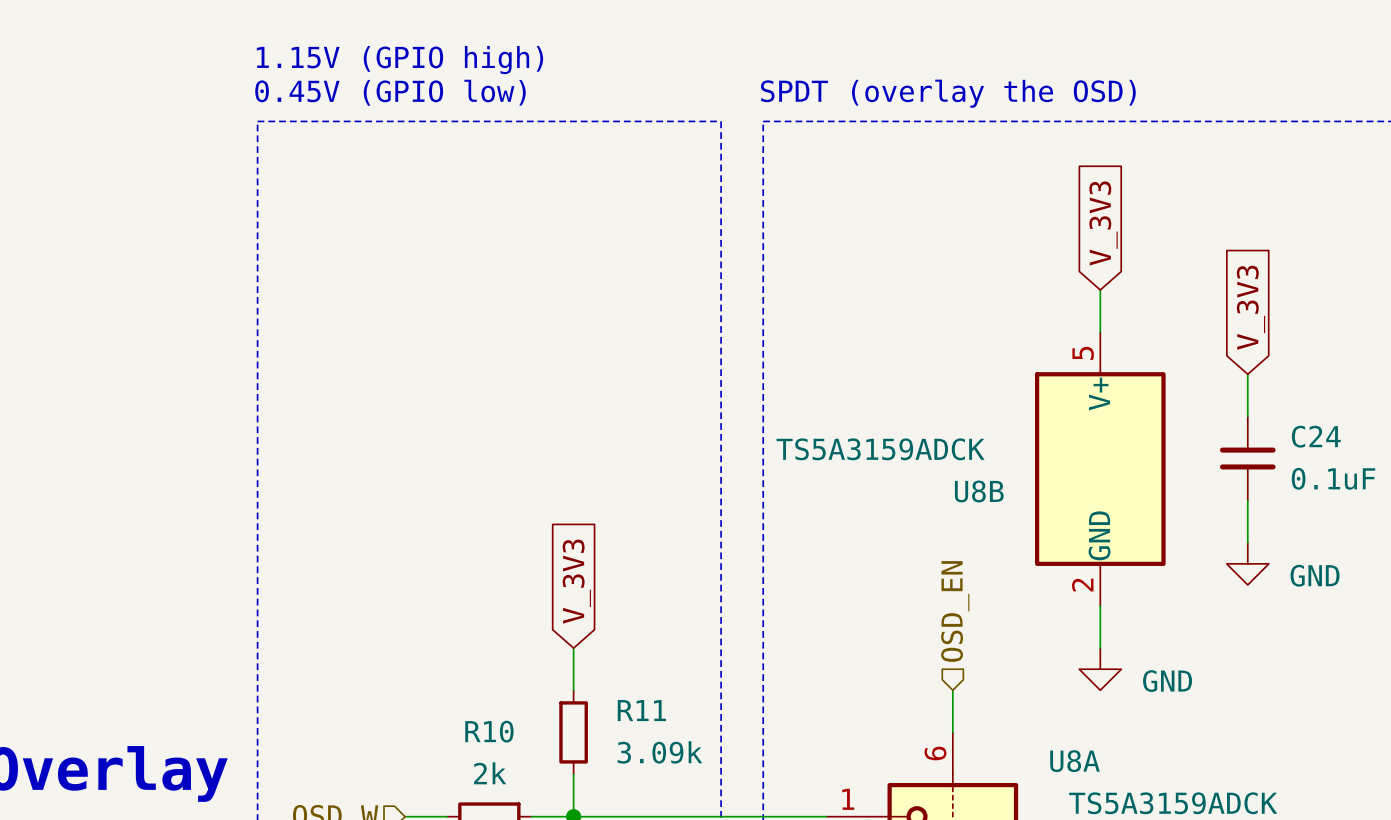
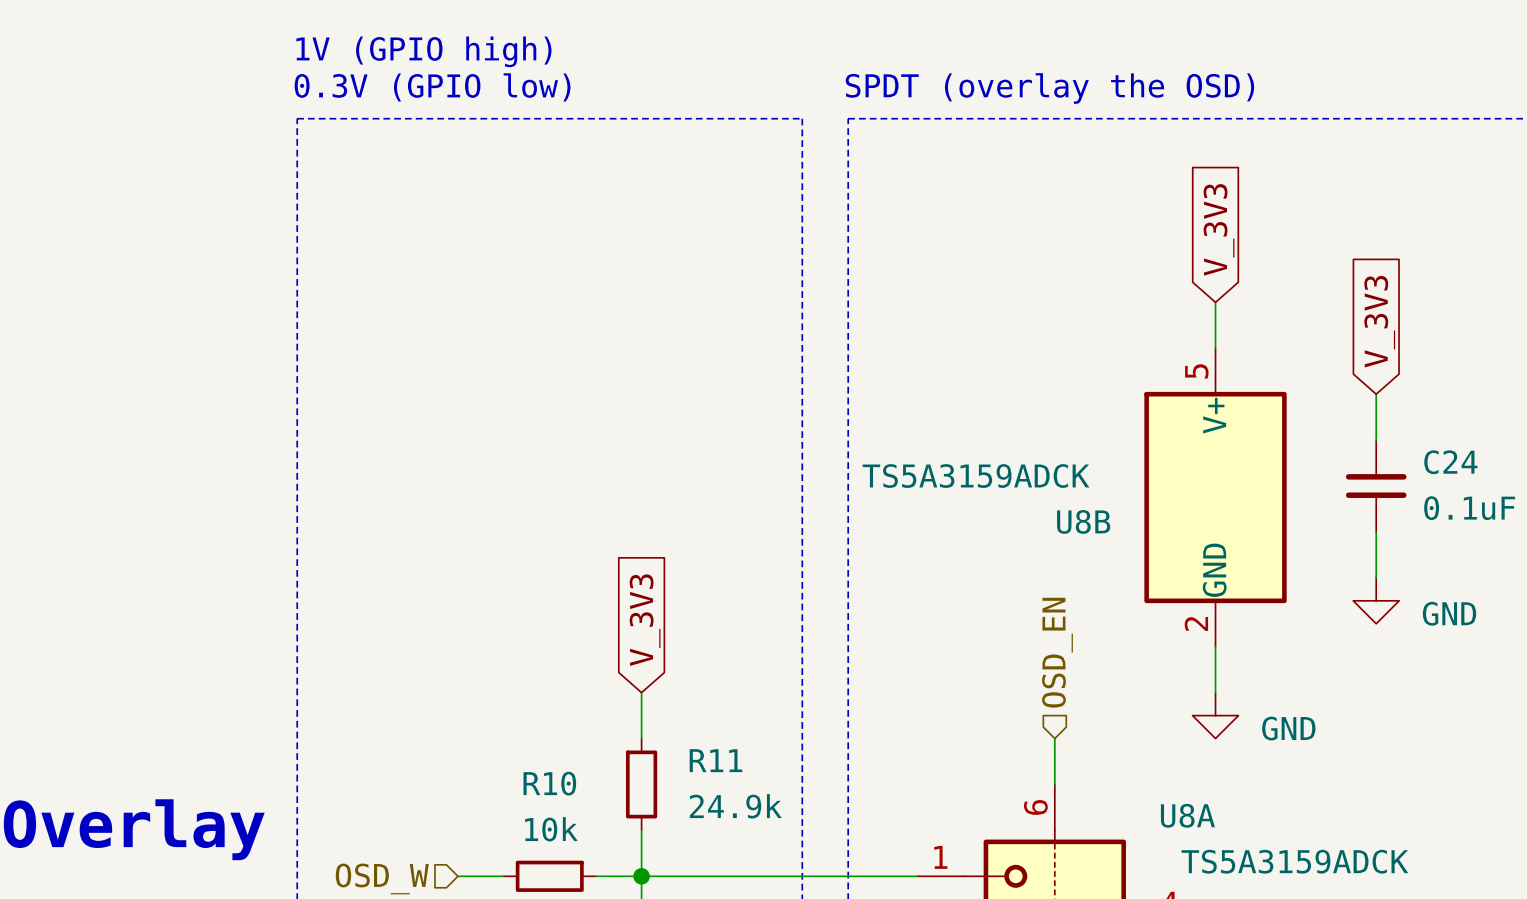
text: 1.15V (GPIO high) (399, 60) -> 1V (GPIO high) (423, 51)
text: 0.45V (GPIO low) (390, 92) -> 0.3V (GPIO low) (432, 87)
R11 value: 3.09k (659, 752) -> 24.9k (735, 806)
R10 value: 2k (490, 773) -> 10k (551, 829)

